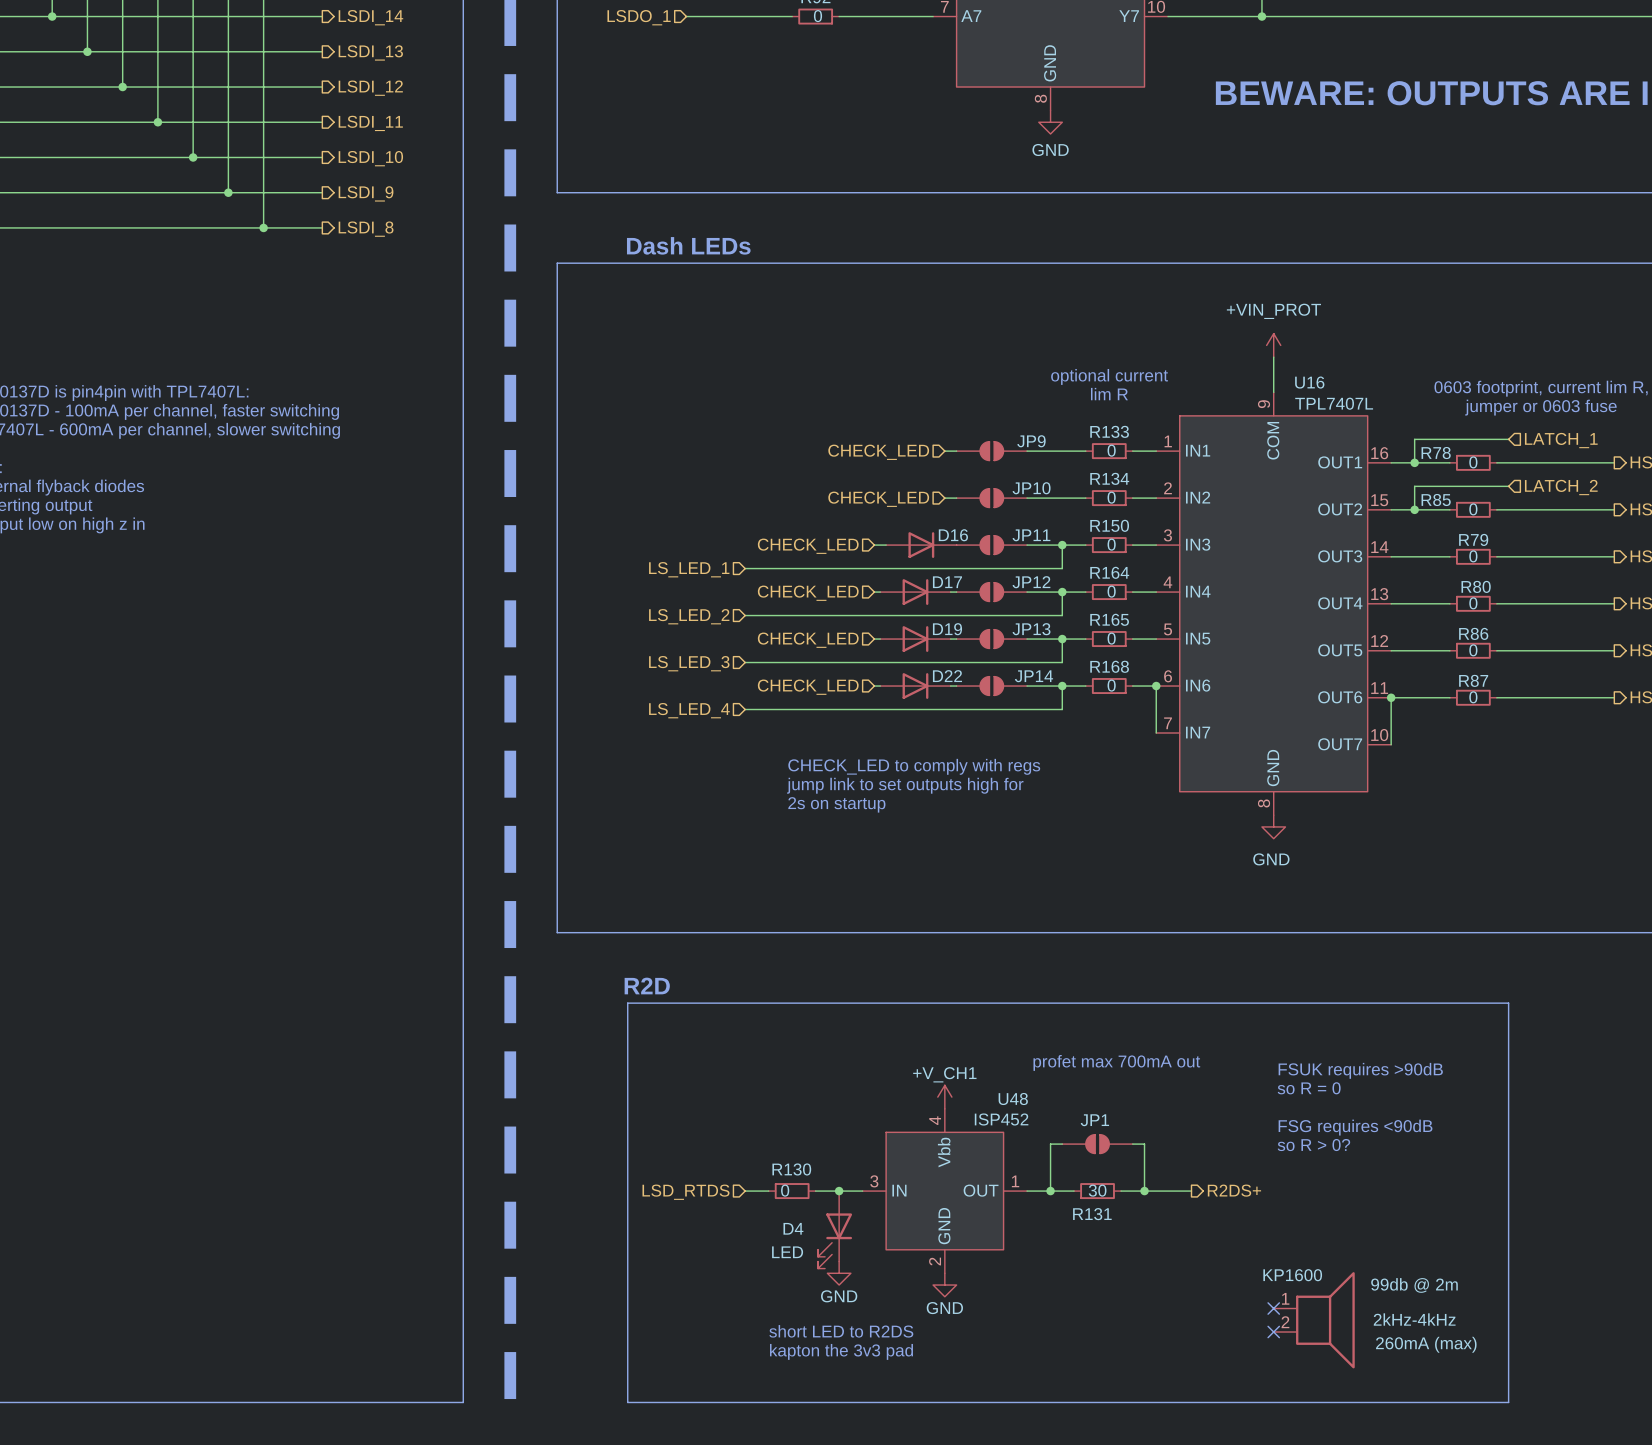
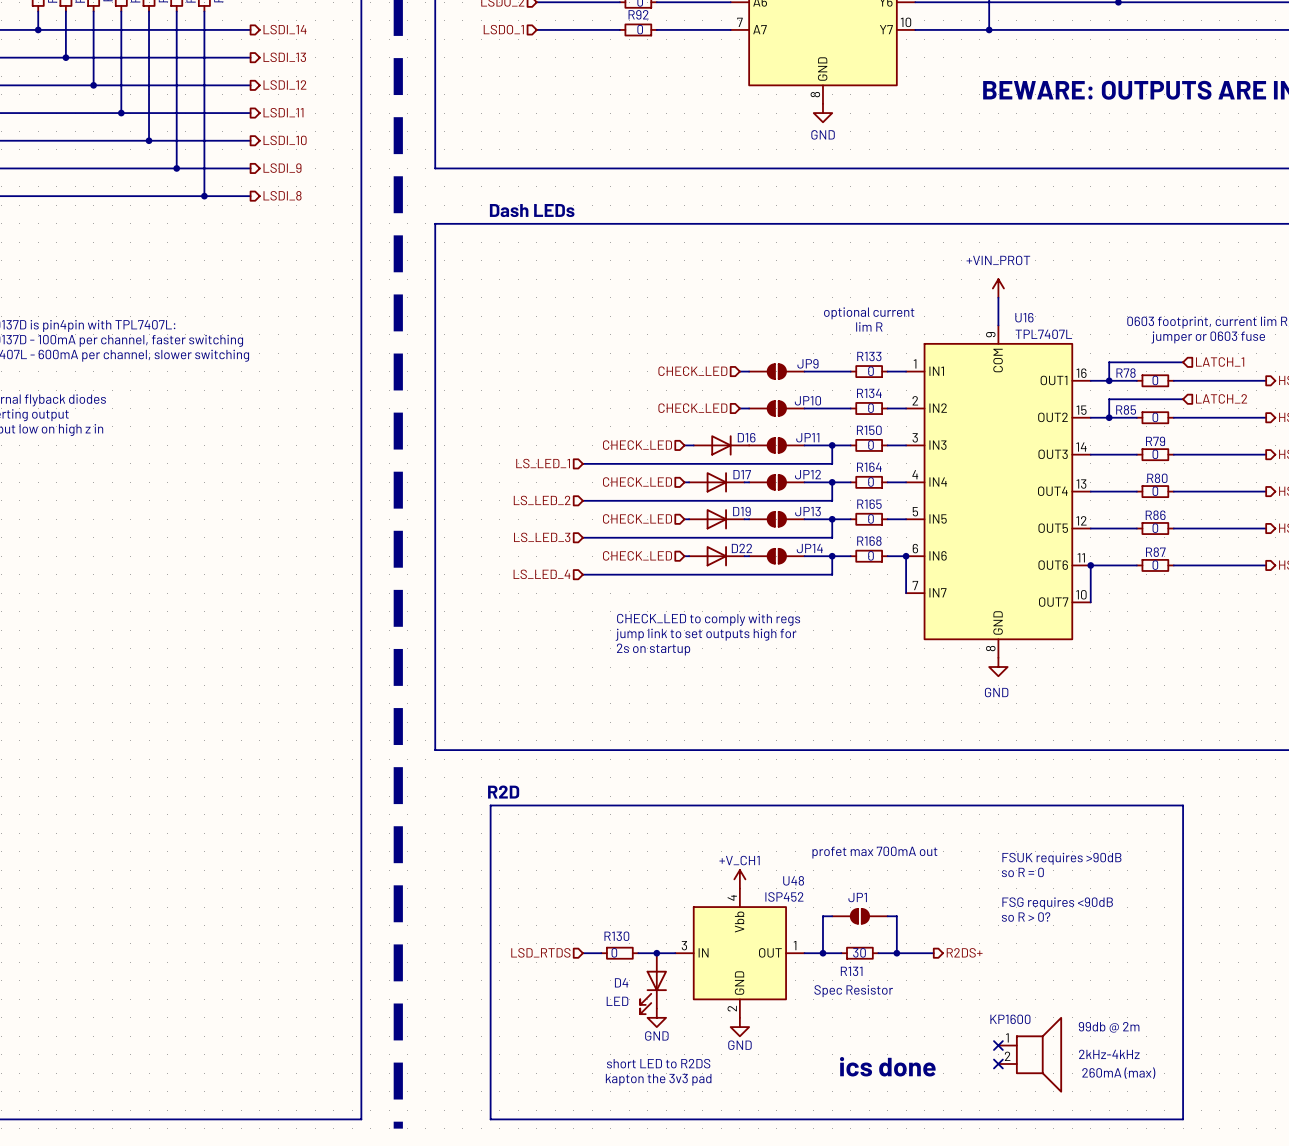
text: none -> Spec Resistor (853, 991)
text: none -> ics done (887, 1066)

